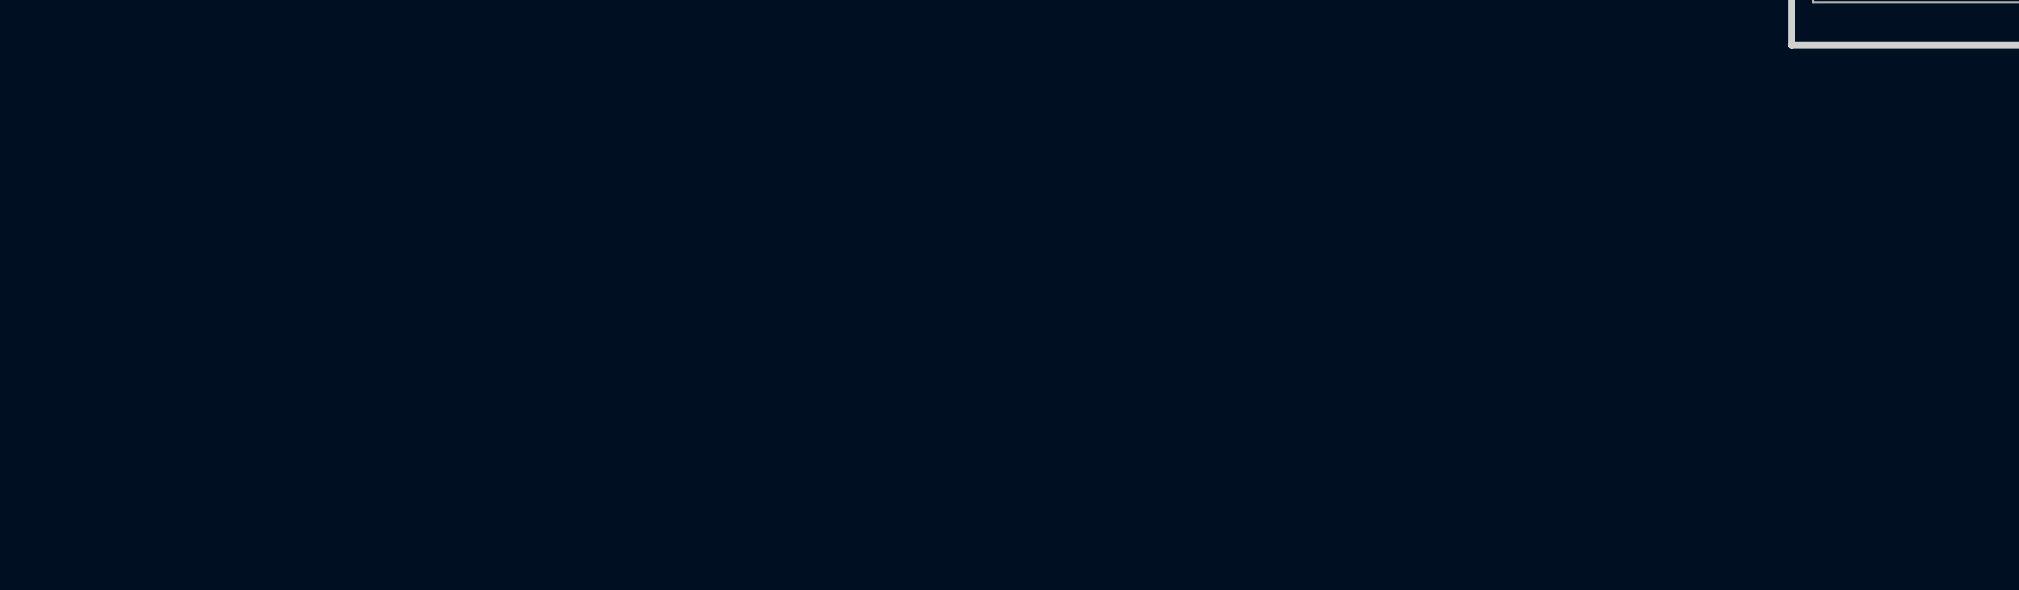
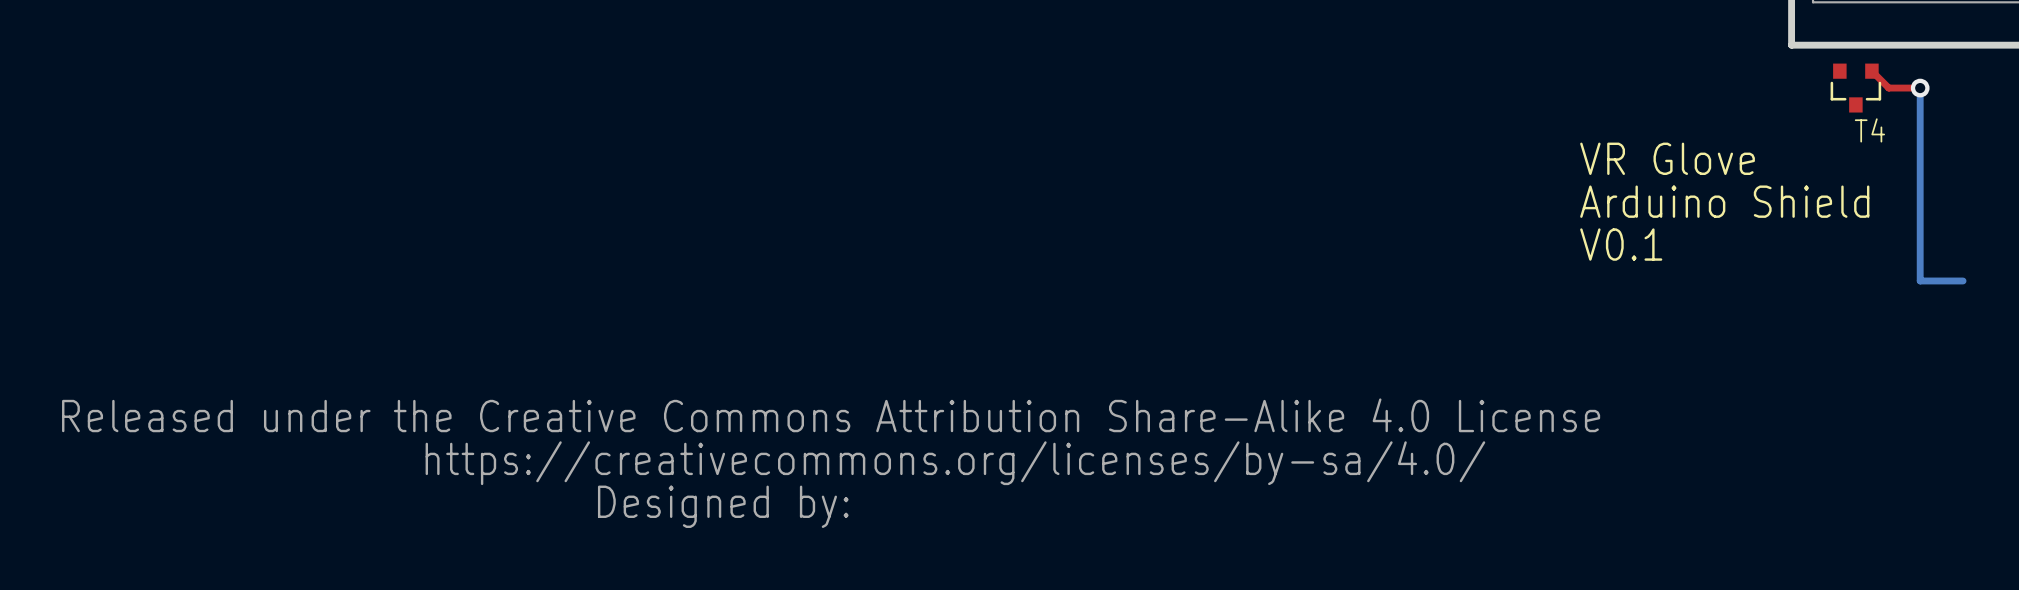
top track: none -> (1871, 71) (1888, 88) (1920, 88)
T4: none -> (1855, 88)
bottom track: none -> (1920, 88) (1920, 280) (1963, 280)
via: none -> (1920, 88)
text: none -> VR Glove (1667, 158)
text: none -> Arduino Shield (1724, 201)
text: none -> V0.1 (1621, 244)
drawing: none -> [62, 398, 1601, 528]

